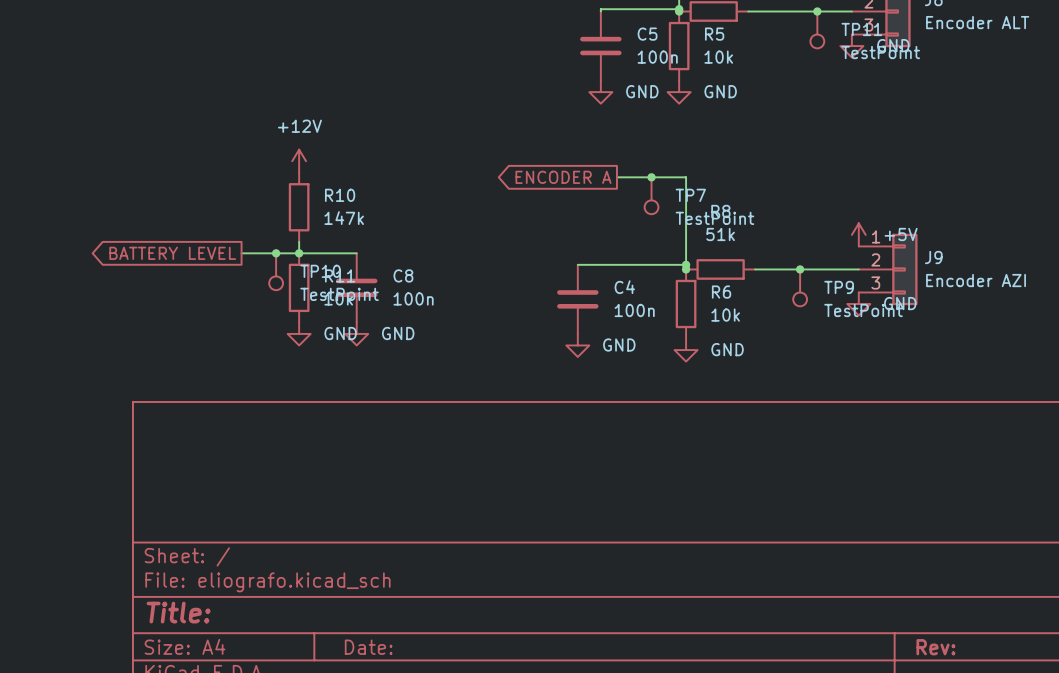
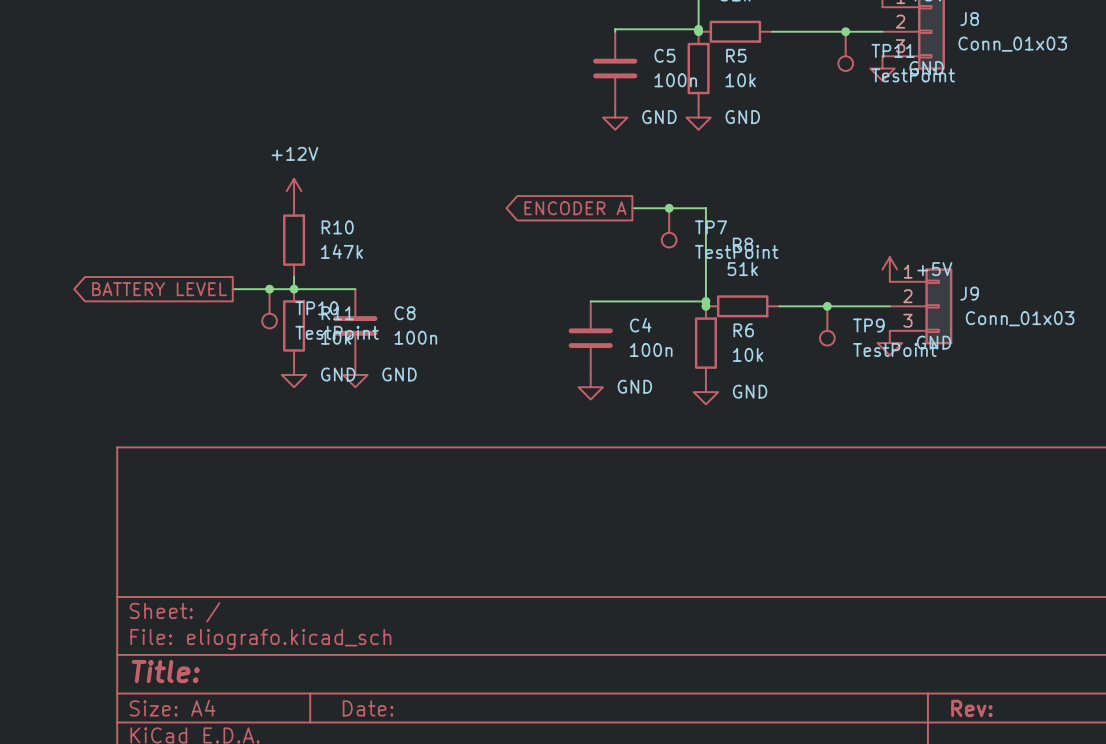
J8 value: Encoder ALT (977, 22) -> Conn_01x03 (1012, 44)
J9 value: Encoder AZI (976, 280) -> Conn_01x03 (1020, 318)

